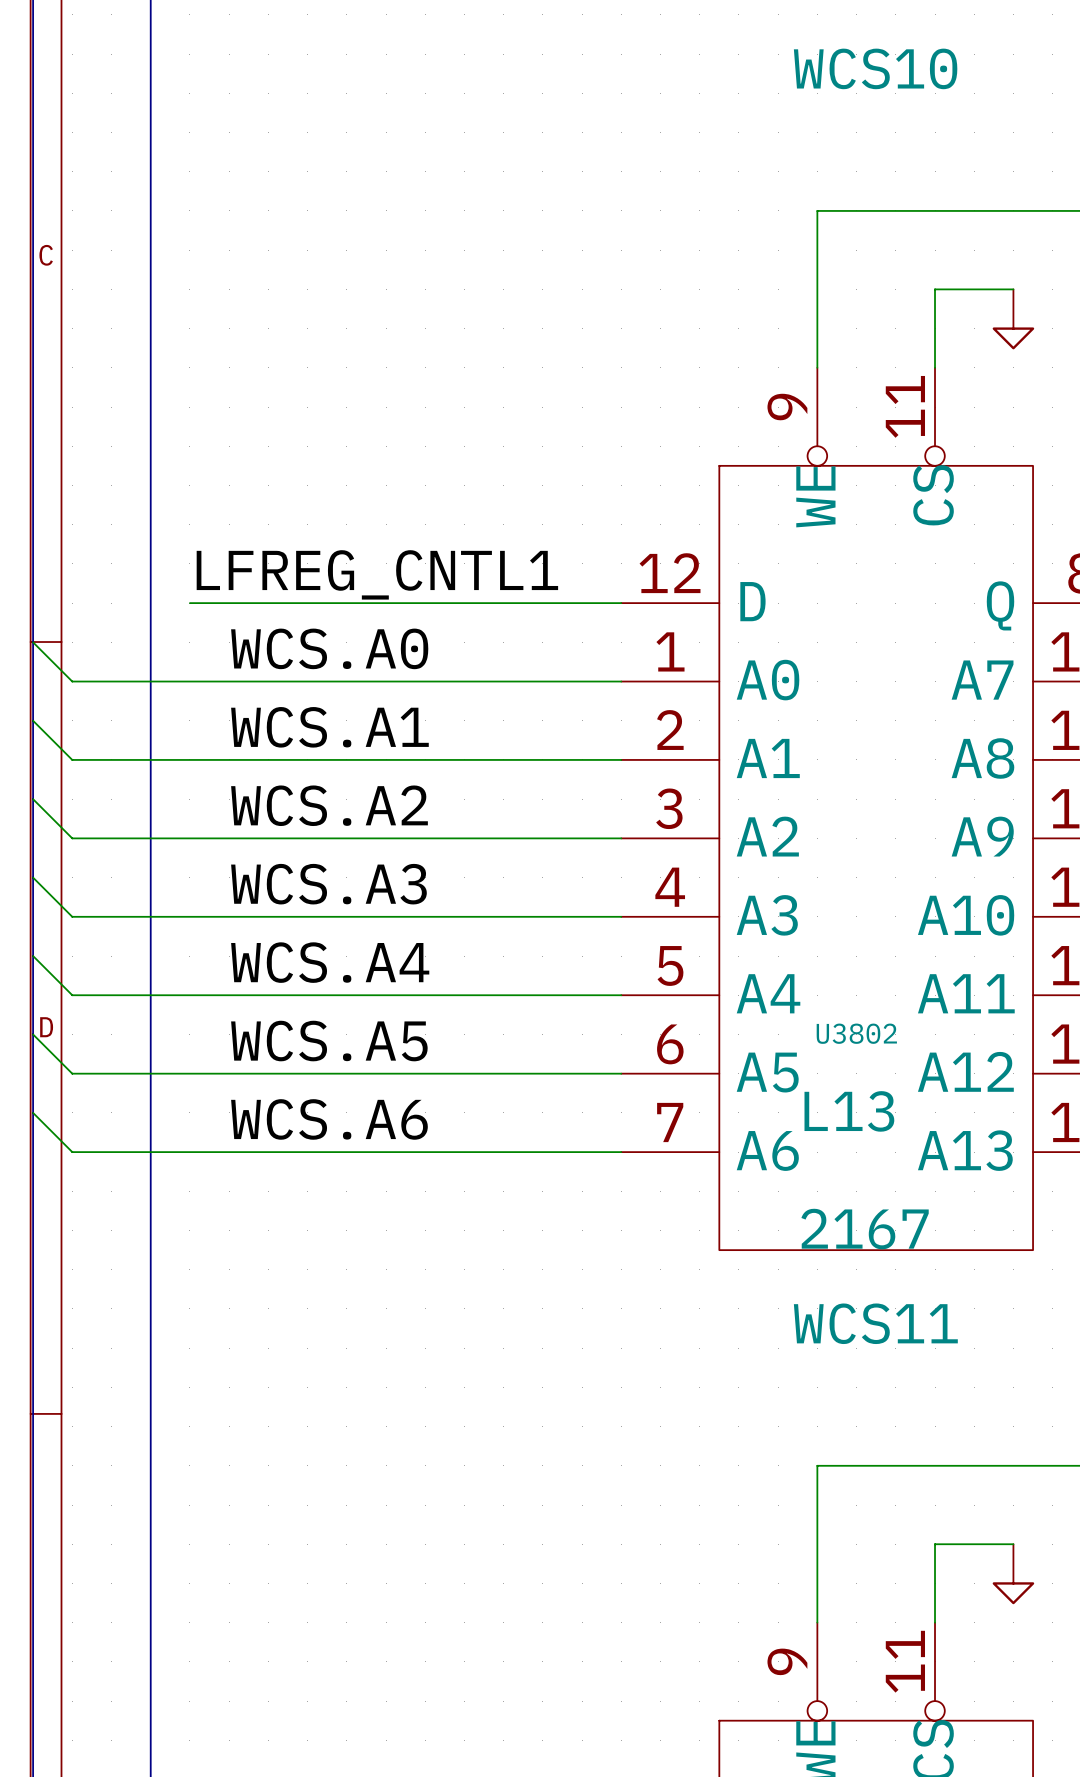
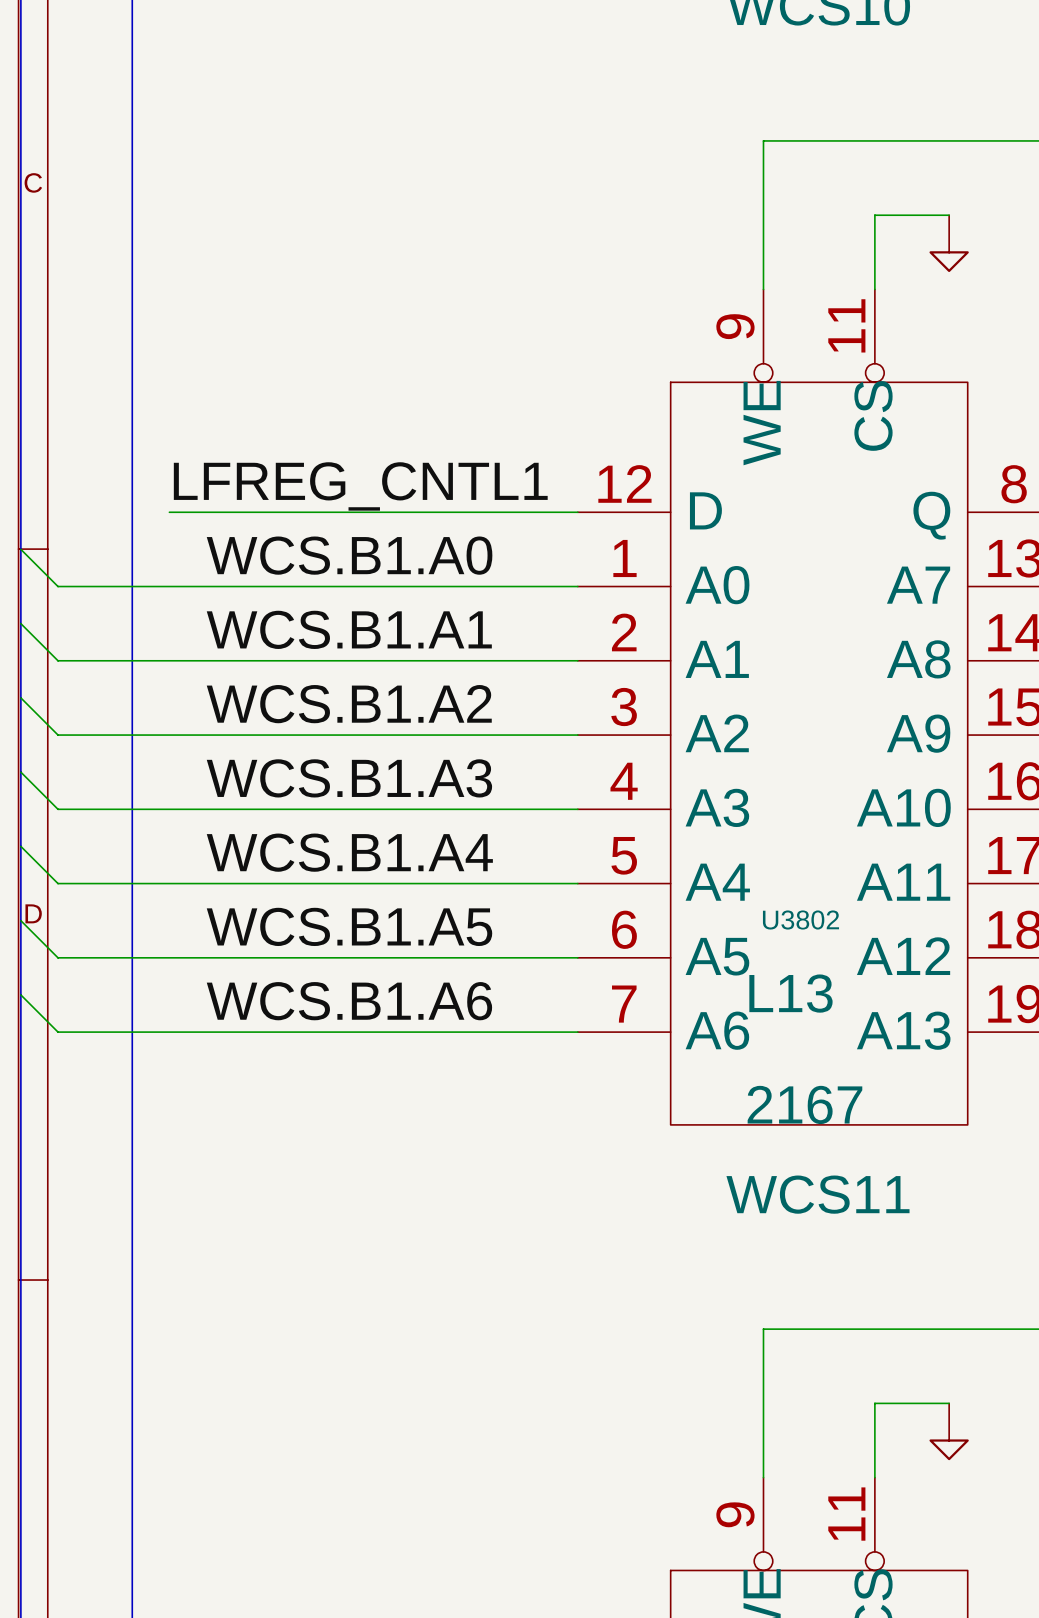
label: WCS.A0 (329, 648) -> WCS.B1.A0 (349, 555)
label: WCS.A1 (329, 727) -> WCS.B1.A1 (349, 629)
label: WCS.A2 (329, 805) -> WCS.B1.A2 (349, 704)
label: WCS.A3 (328, 884) -> WCS.B1.A3 (349, 778)
label: WCS.A4 (330, 962) -> WCS.B1.A4 (349, 852)
label: WCS.A5 (329, 1041) -> WCS.B1.A5 (349, 926)
label: WCS.A6 (329, 1119) -> WCS.B1.A6 (349, 1001)

